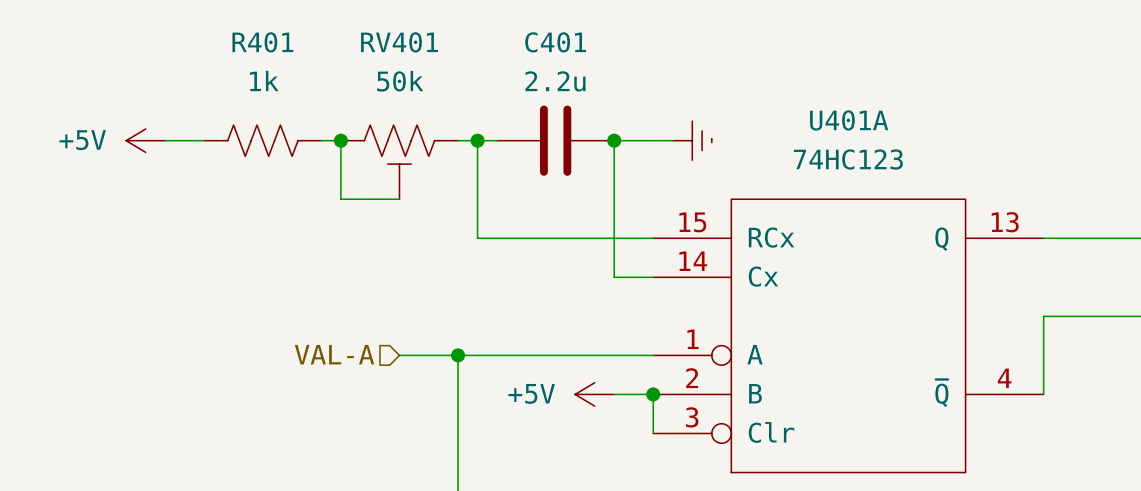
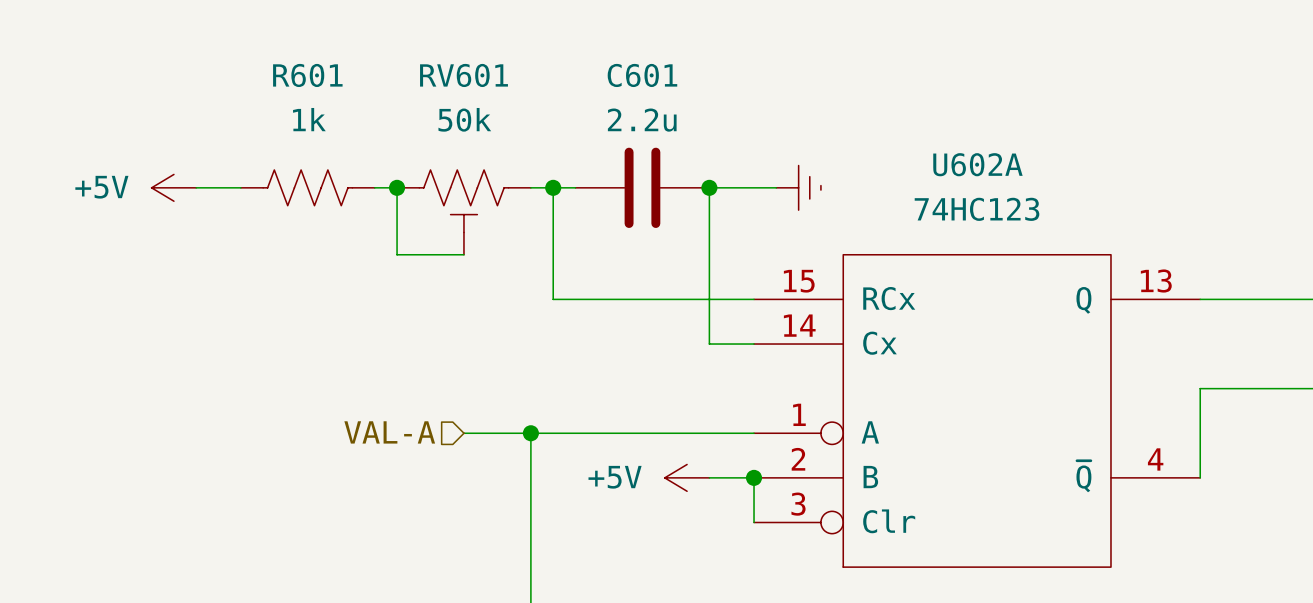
R401 name: R401 (262, 42) -> R601 (307, 75)
RV401 name: RV401 (399, 42) -> RV601 (464, 75)
C401 name: C401 (555, 42) -> C601 (642, 75)
U401A name: U401A (849, 120) -> U602A (977, 164)

